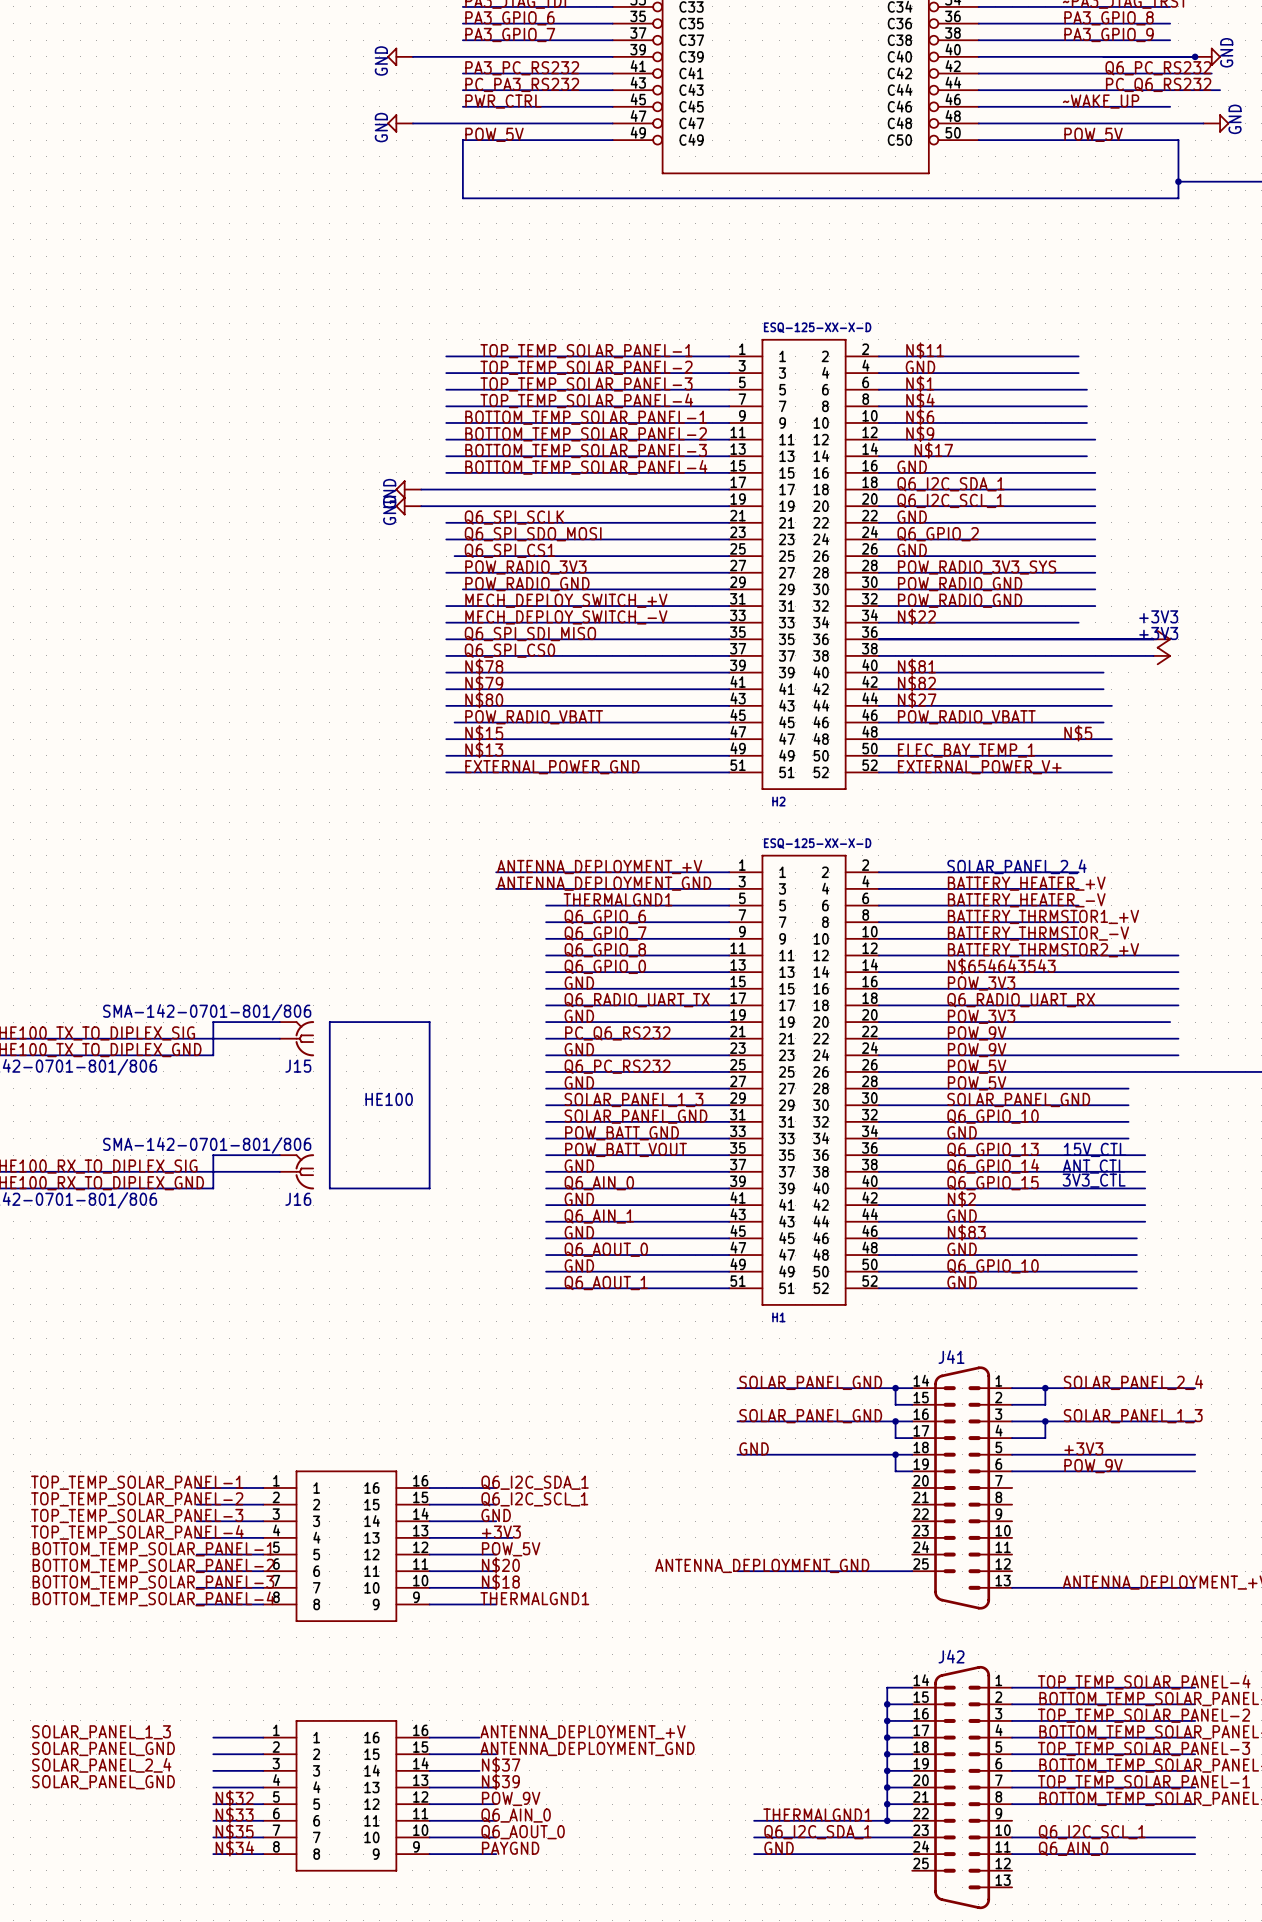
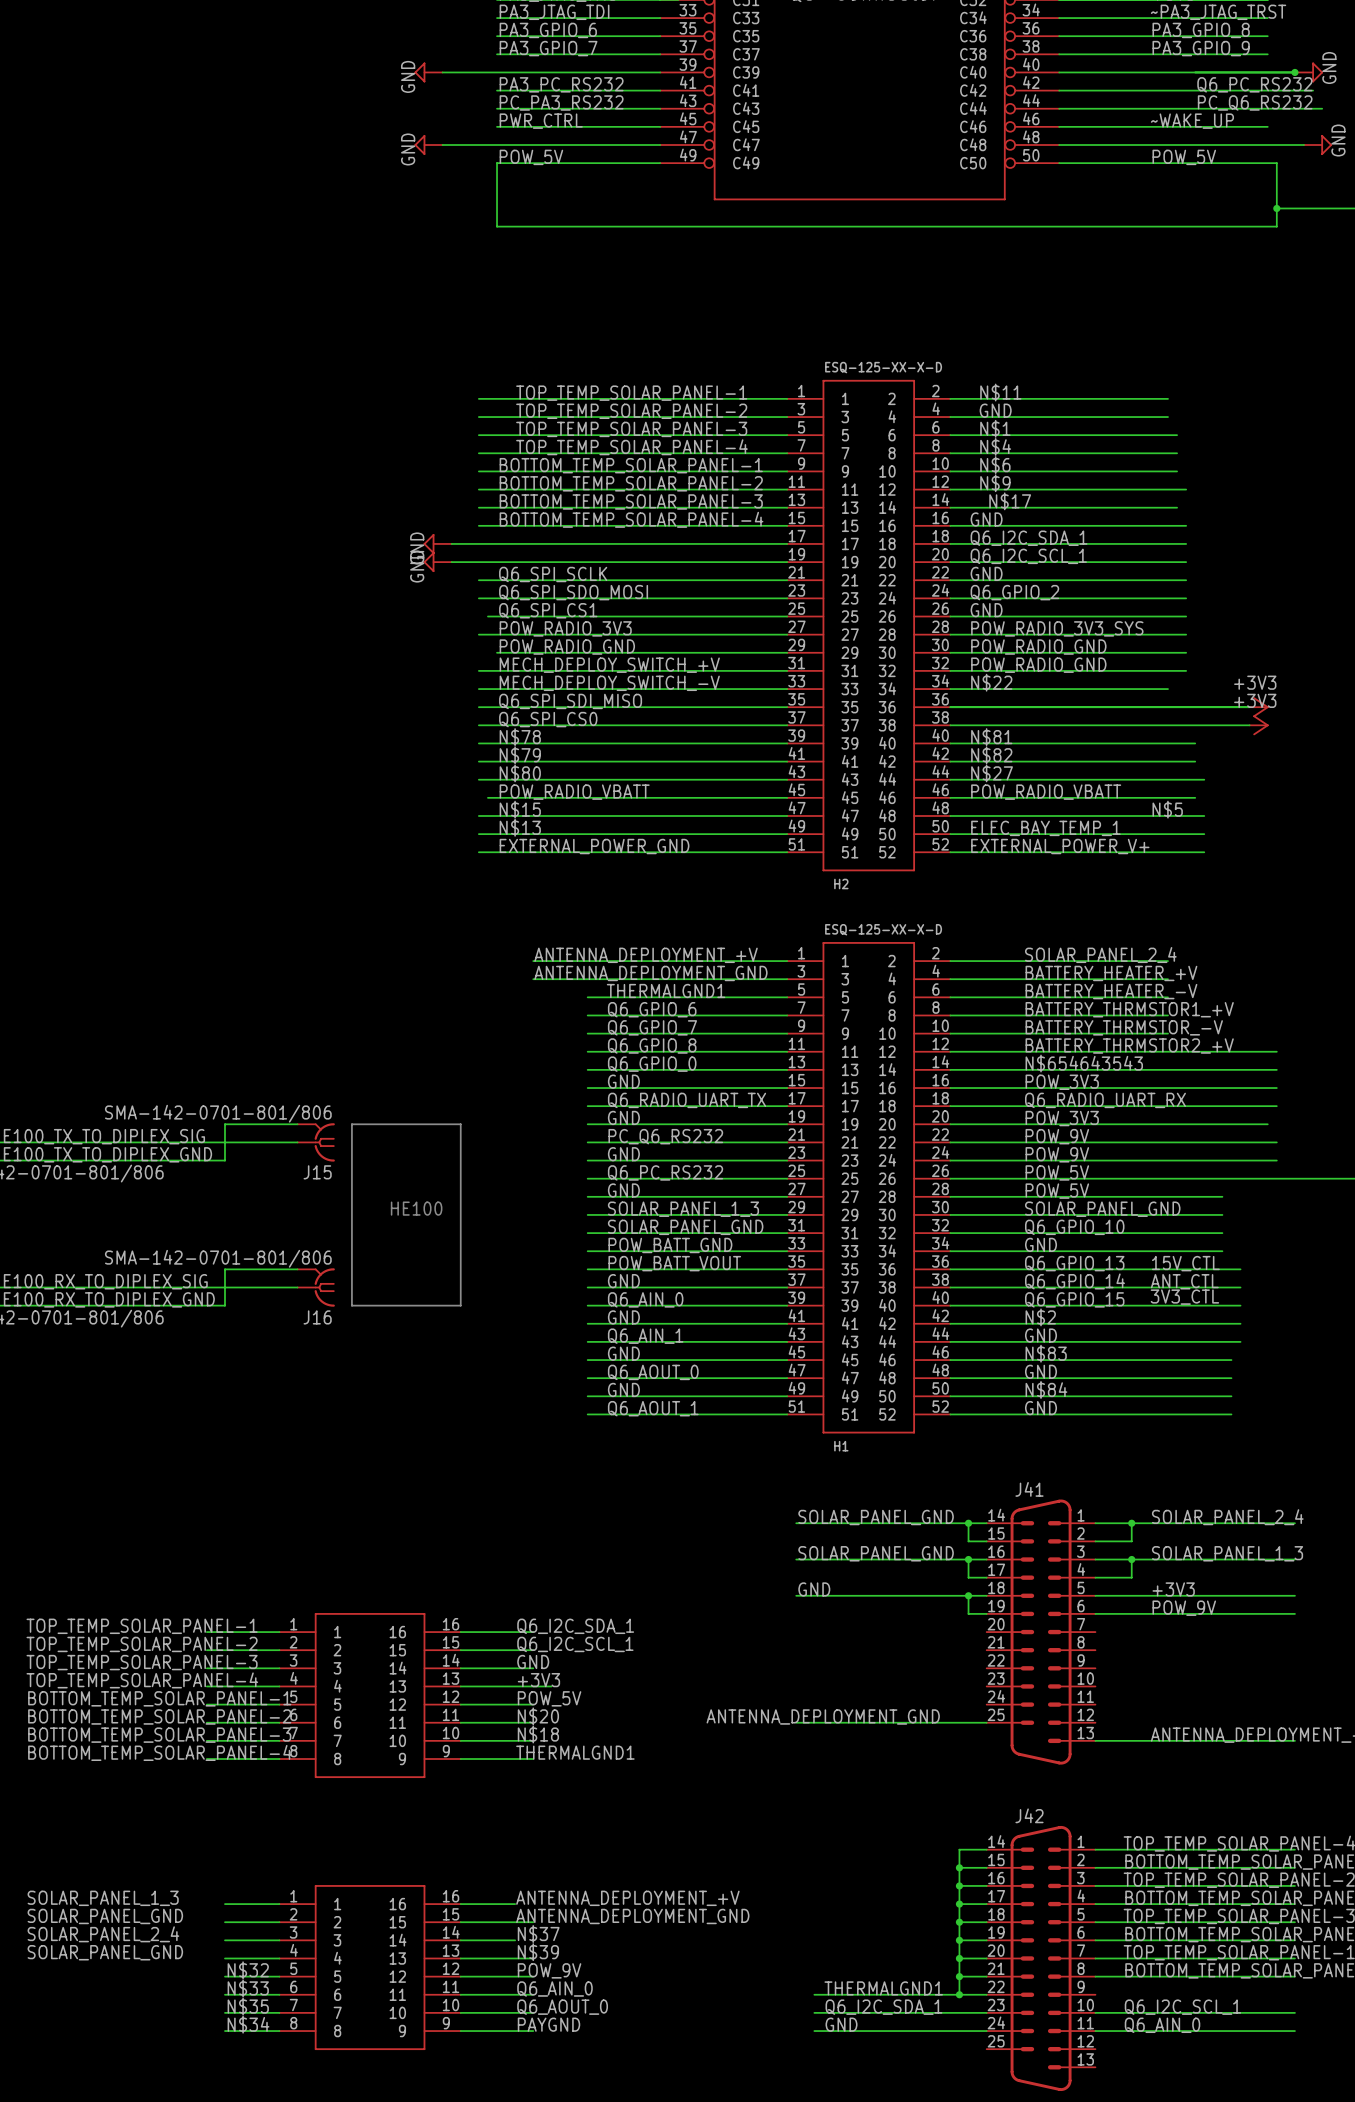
label: Q6_GPIO_10 (993, 1266) -> N$84 (1046, 1389)

